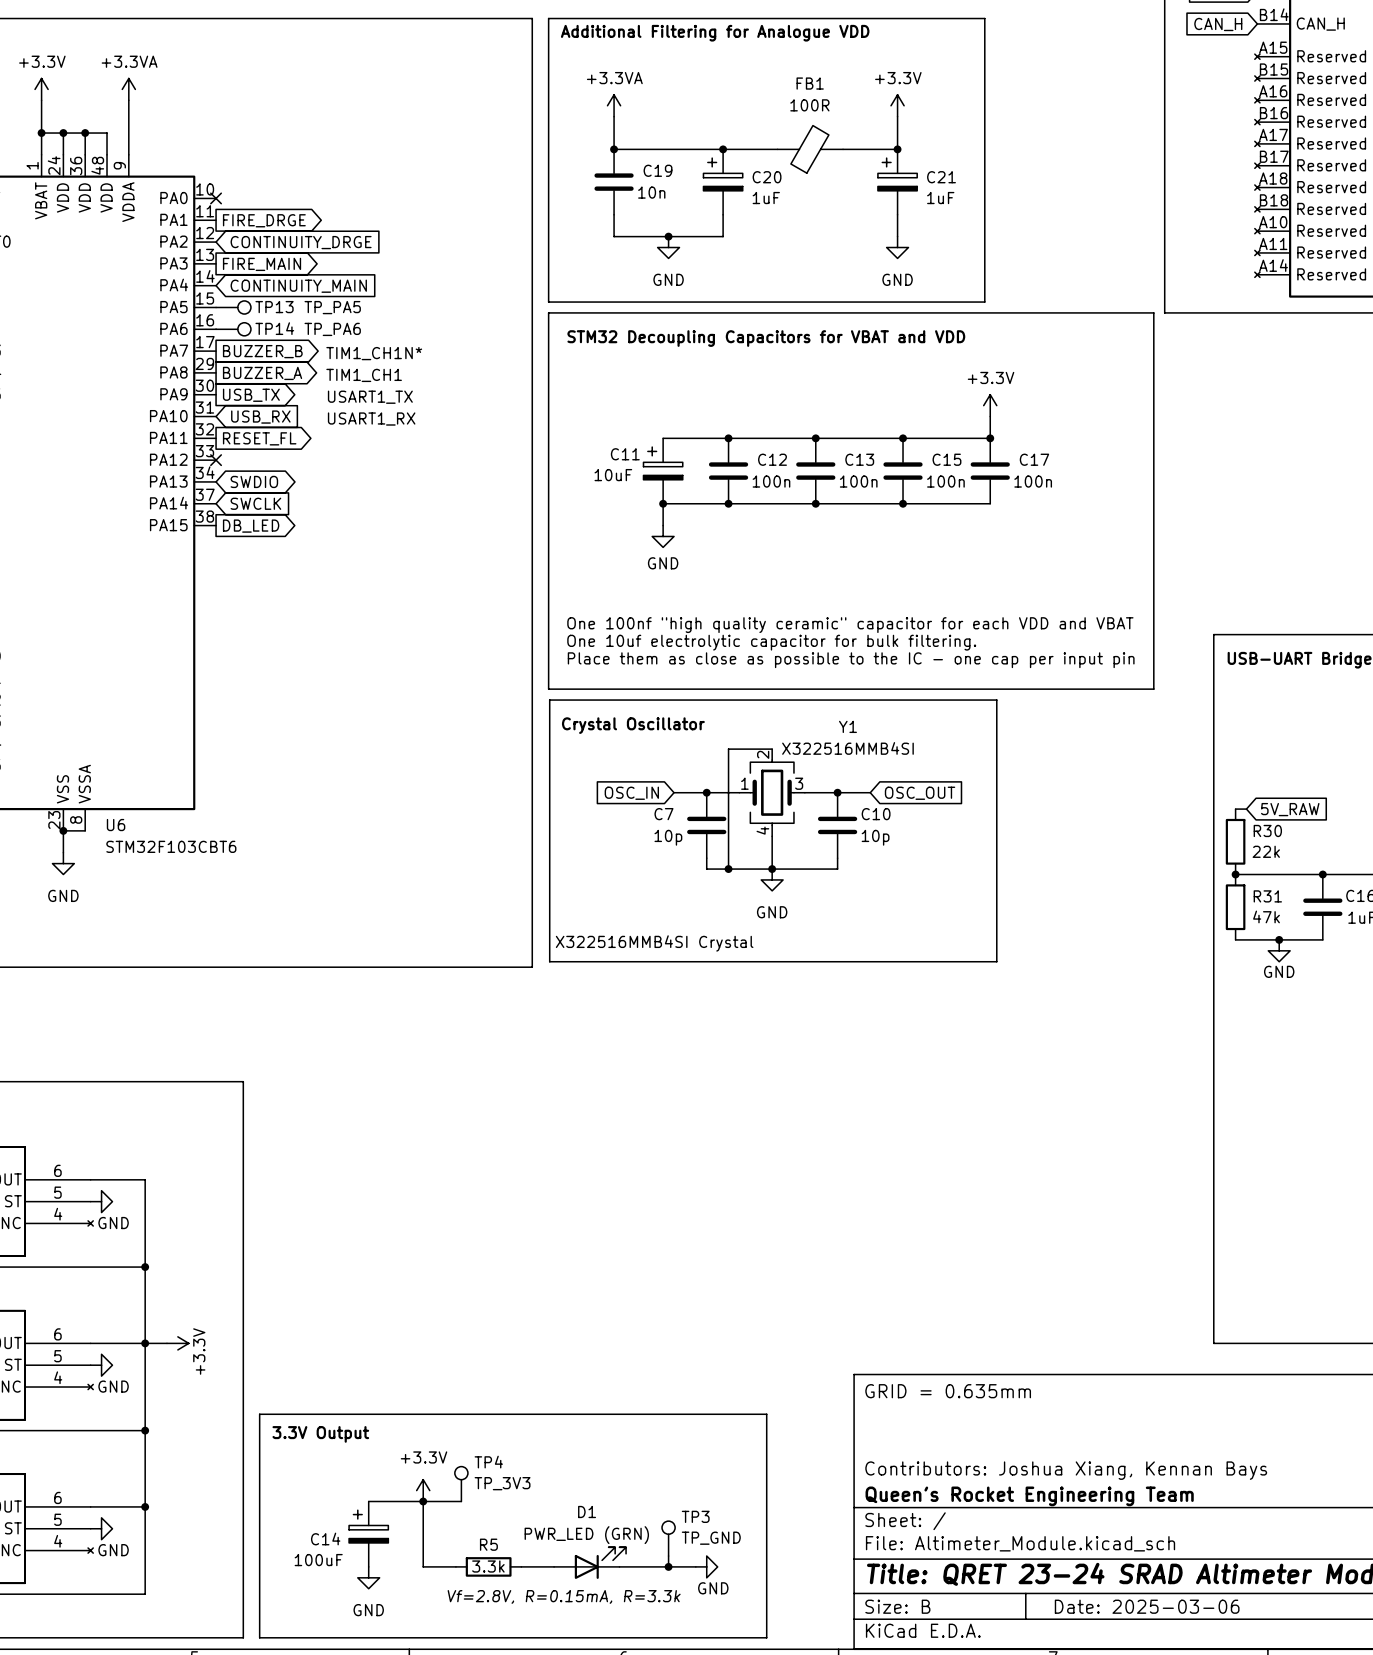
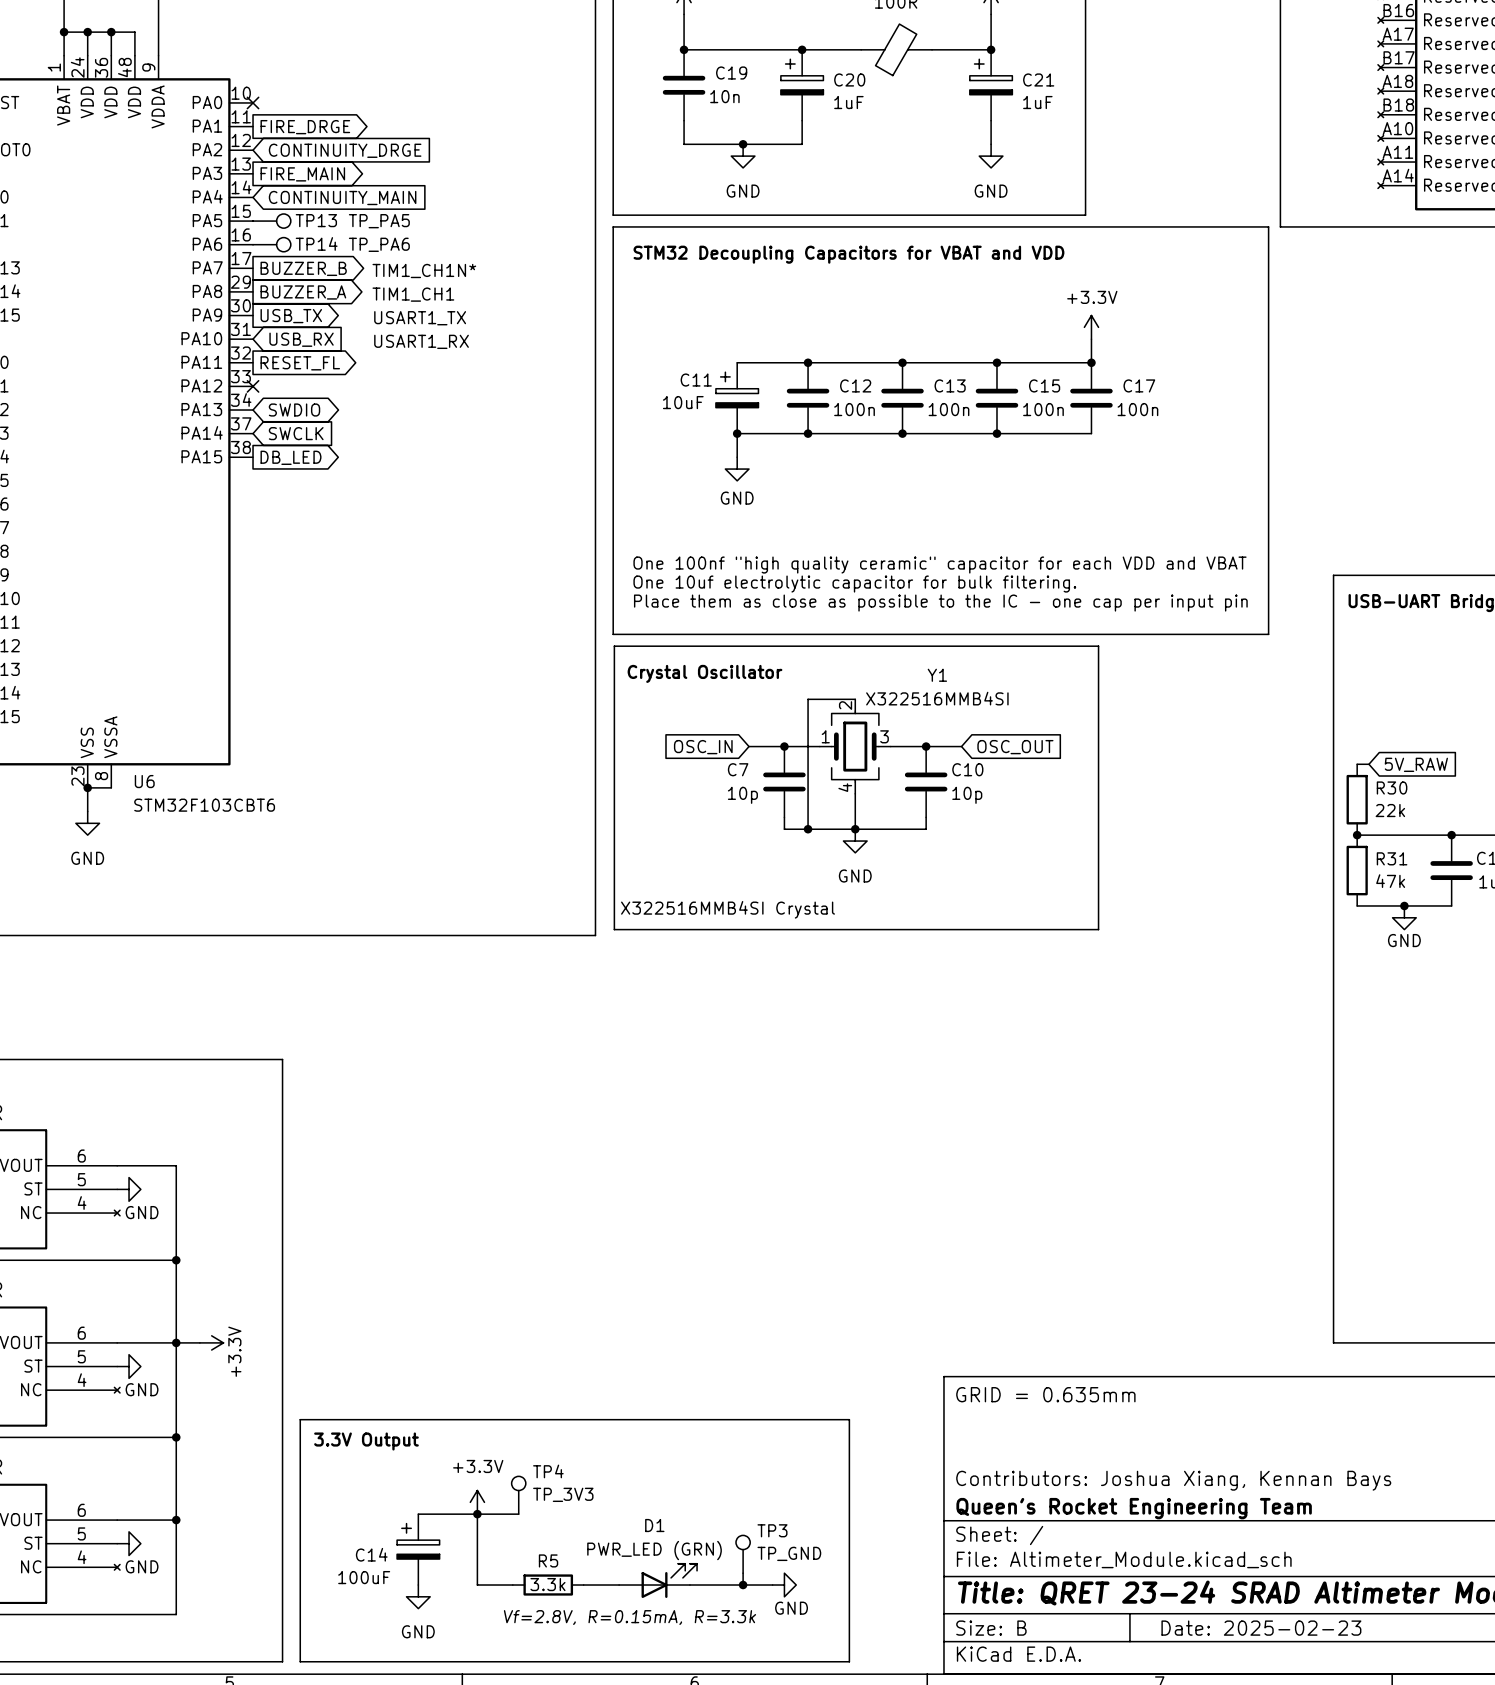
title block: Date: 2025-03-06 (1147, 1606) -> Date: 2025-02-23 (1261, 1628)

